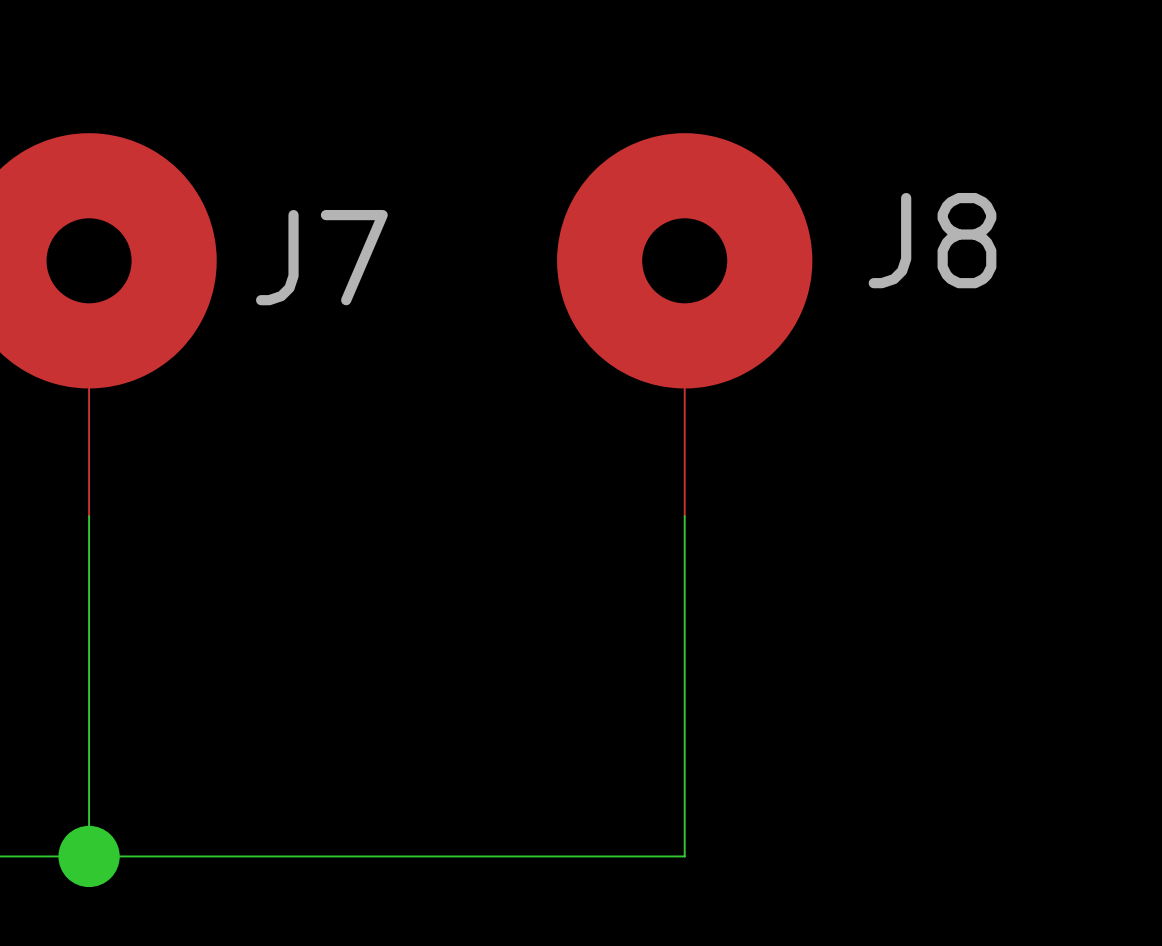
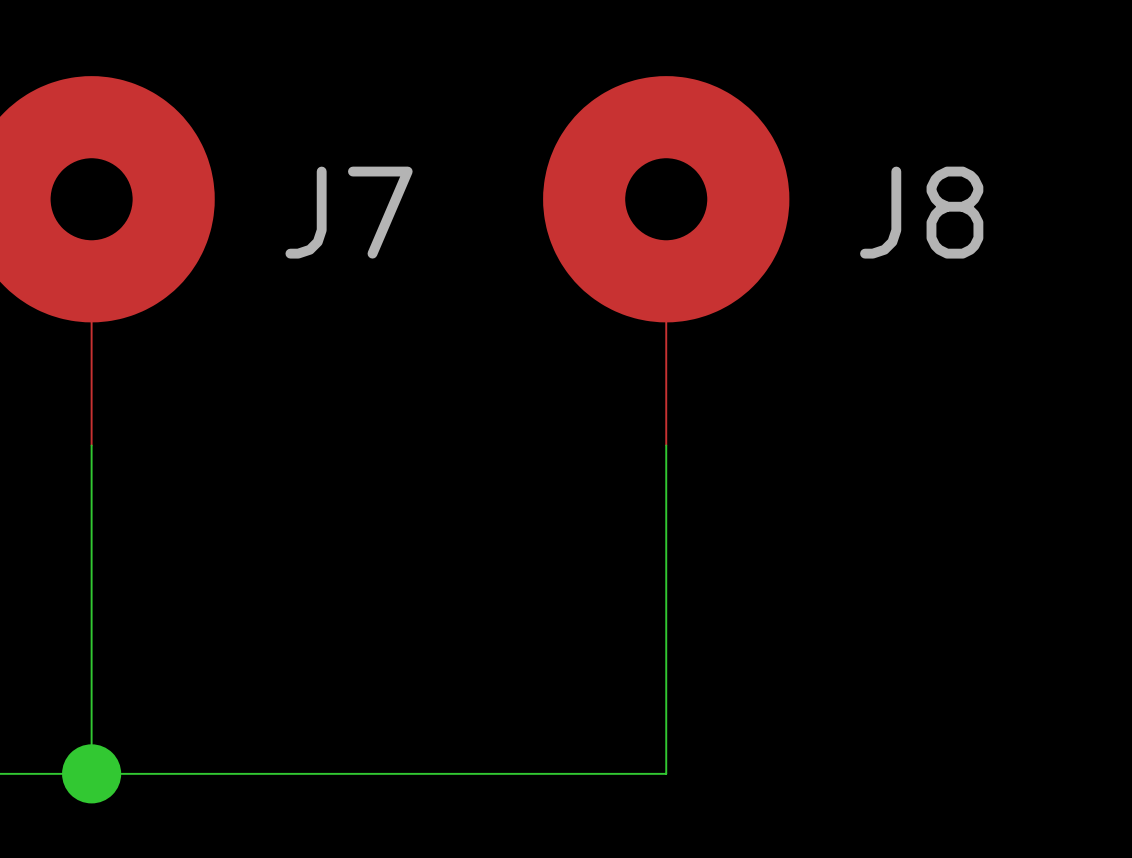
J8 name position: J8 (932, 240) -> J8 (921, 212)
J7 name position: J7 (321, 257) -> J7 (349, 212)

